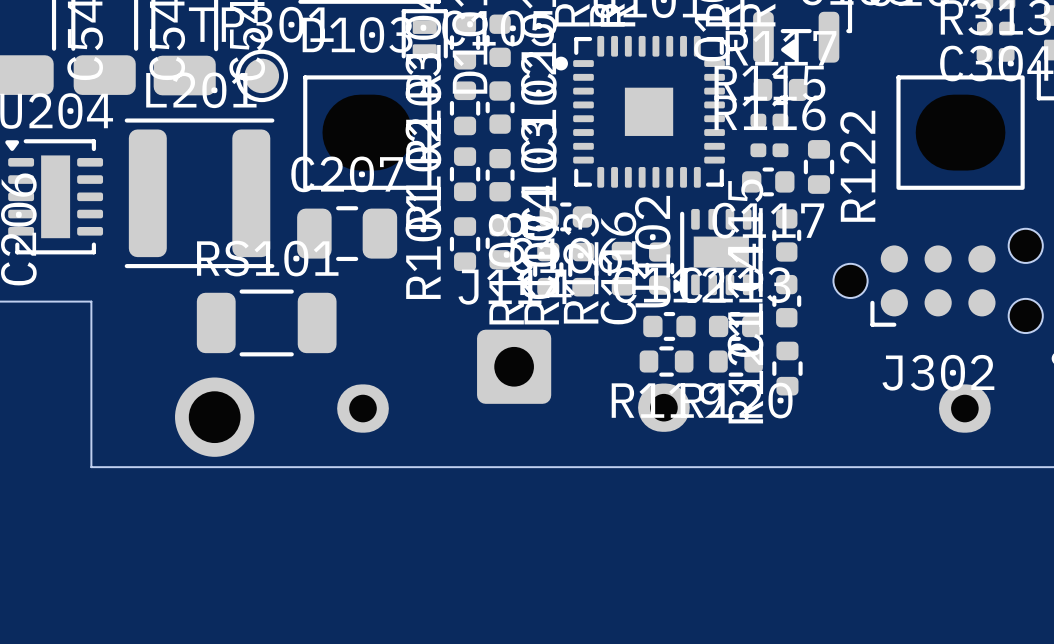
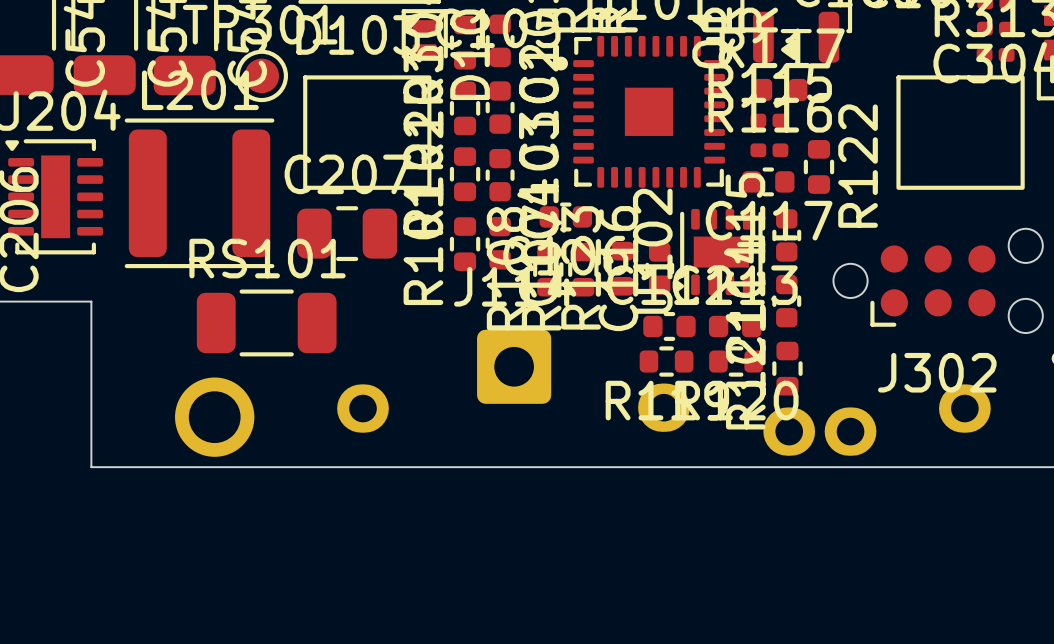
part: none -> (789, 431)
part: none -> (850, 431)

